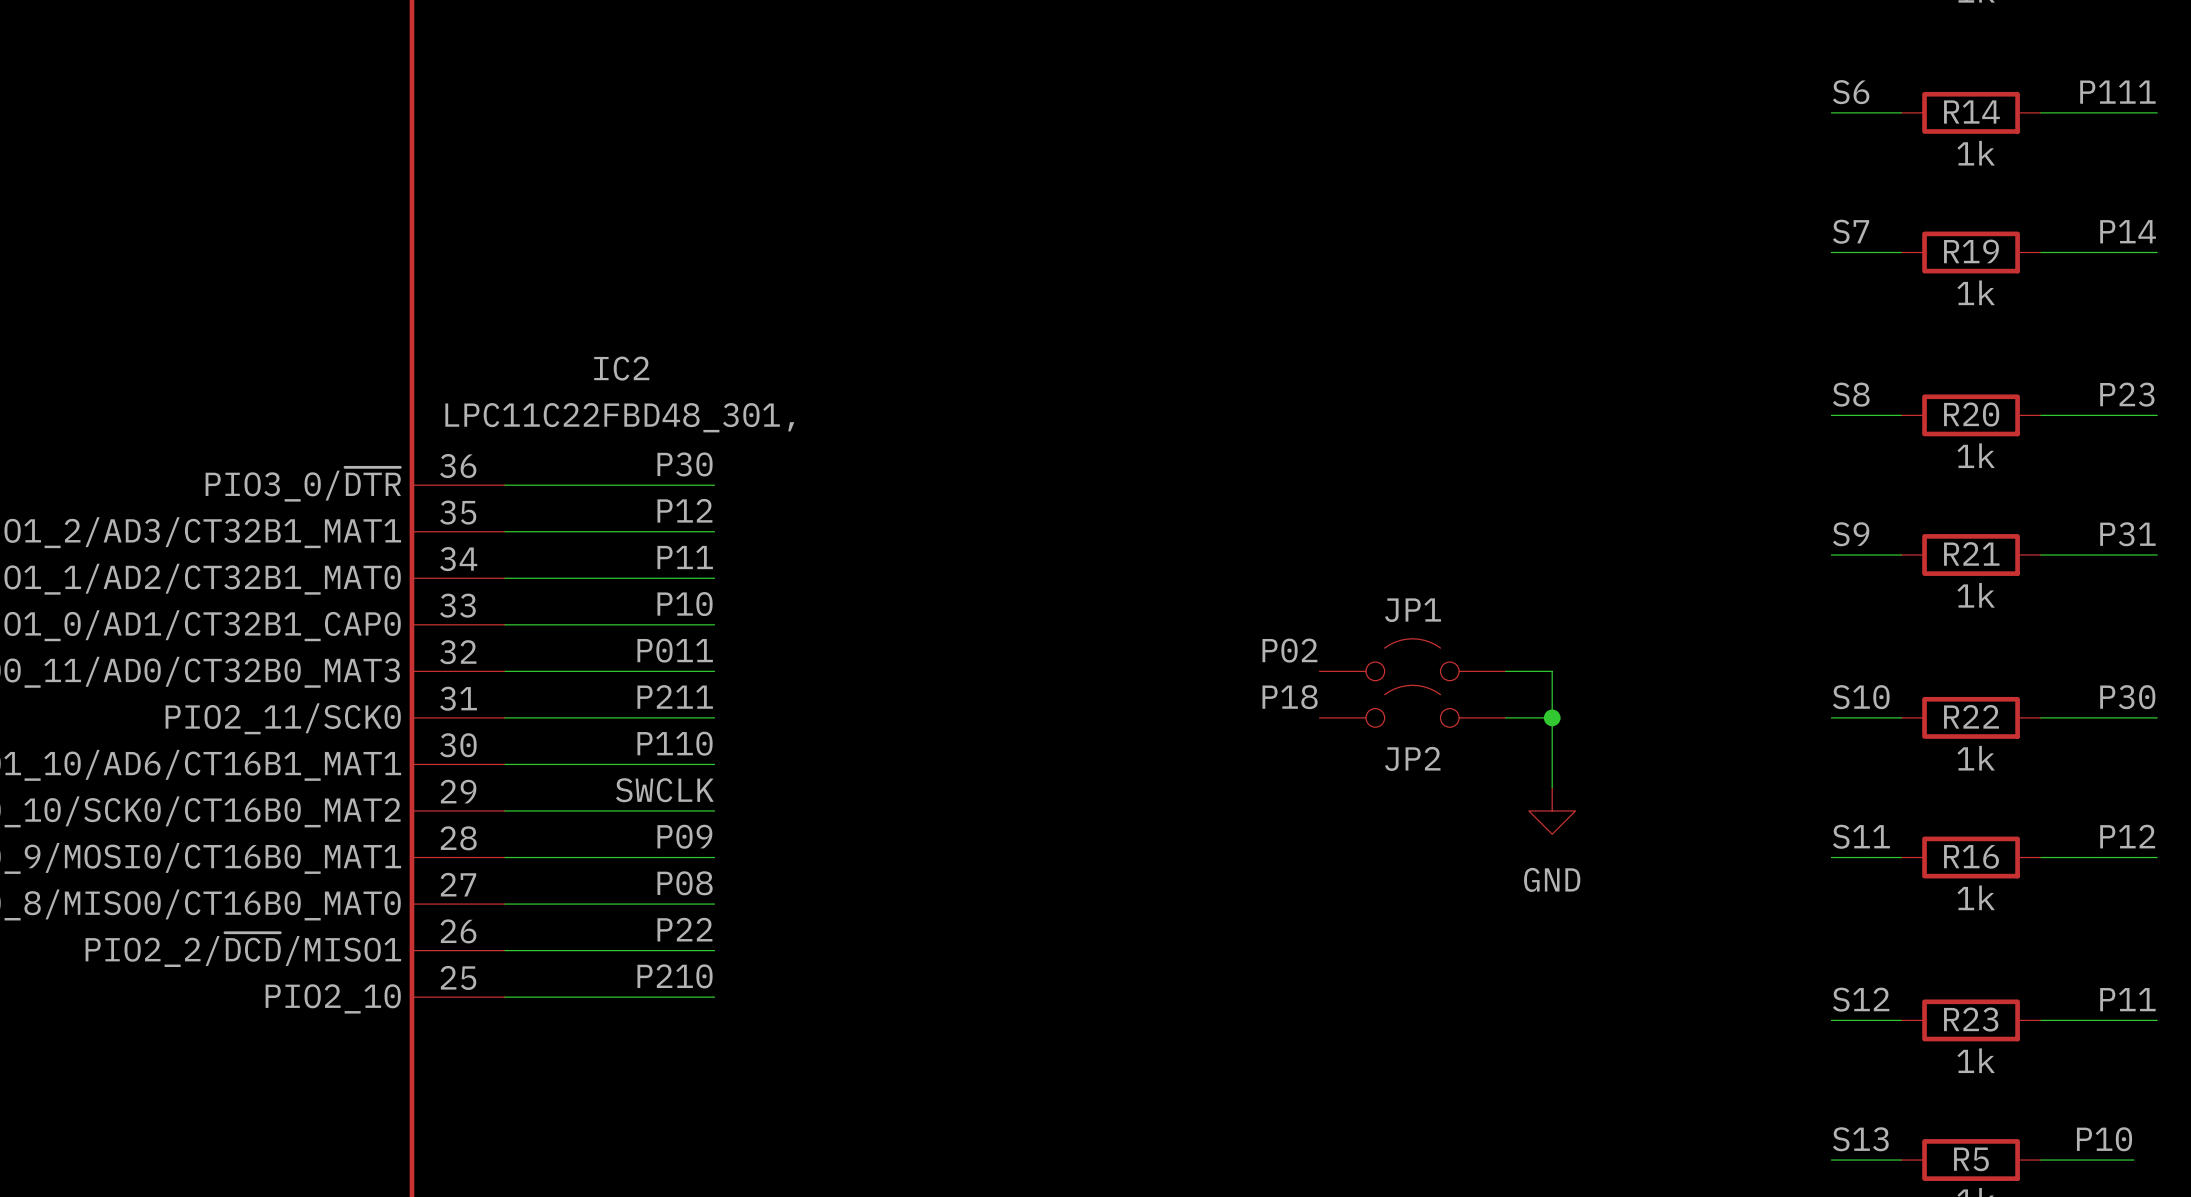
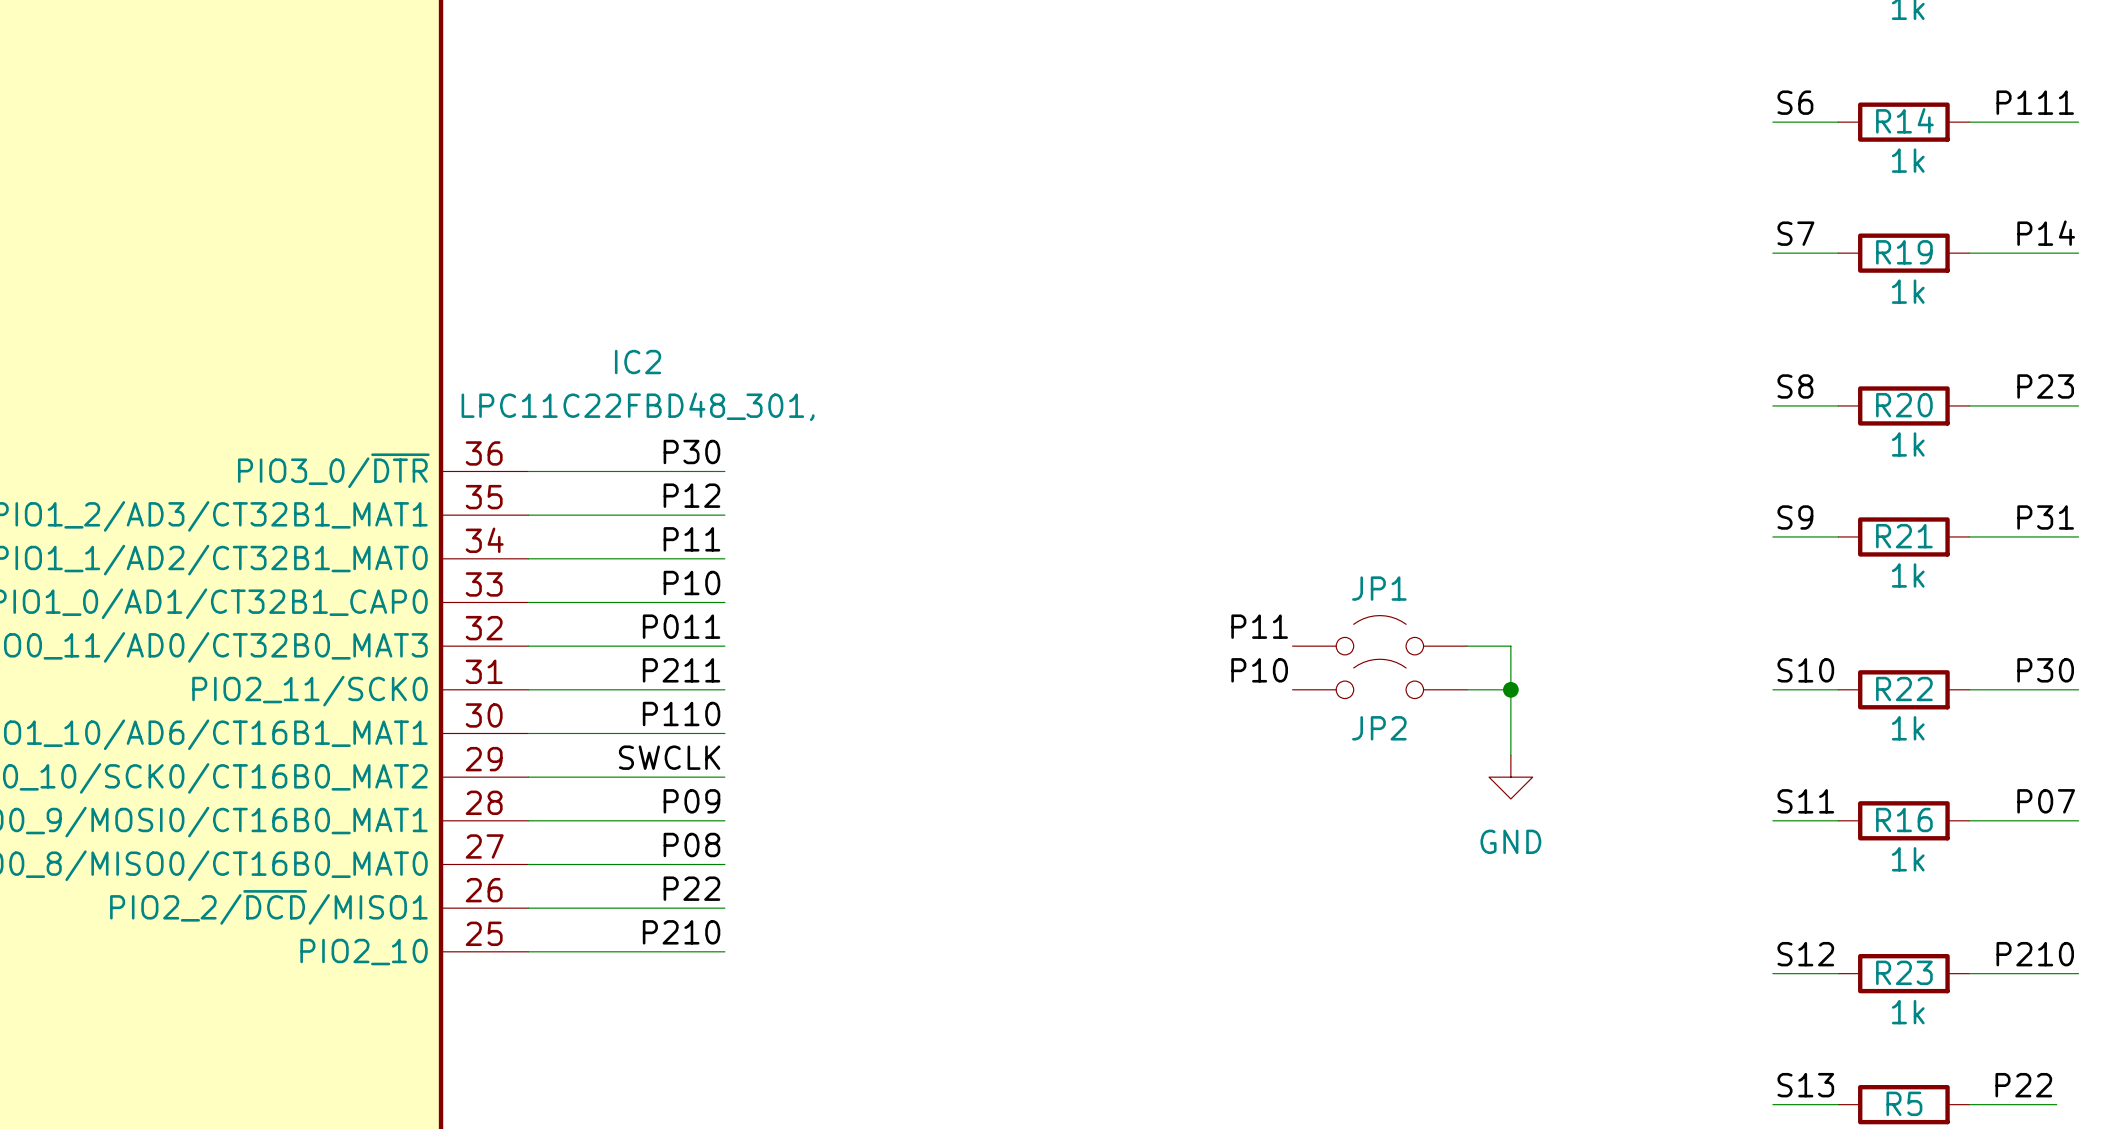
label: P02 (1289, 650) -> P11 (1259, 626)
label: P18 (1290, 697) -> P10 (1259, 670)
label: P12 (2127, 836) -> P07 (2046, 801)
label: P11 (2127, 999) -> P210 (2035, 954)
label: P10 (2104, 1139) -> P22 (2023, 1085)

